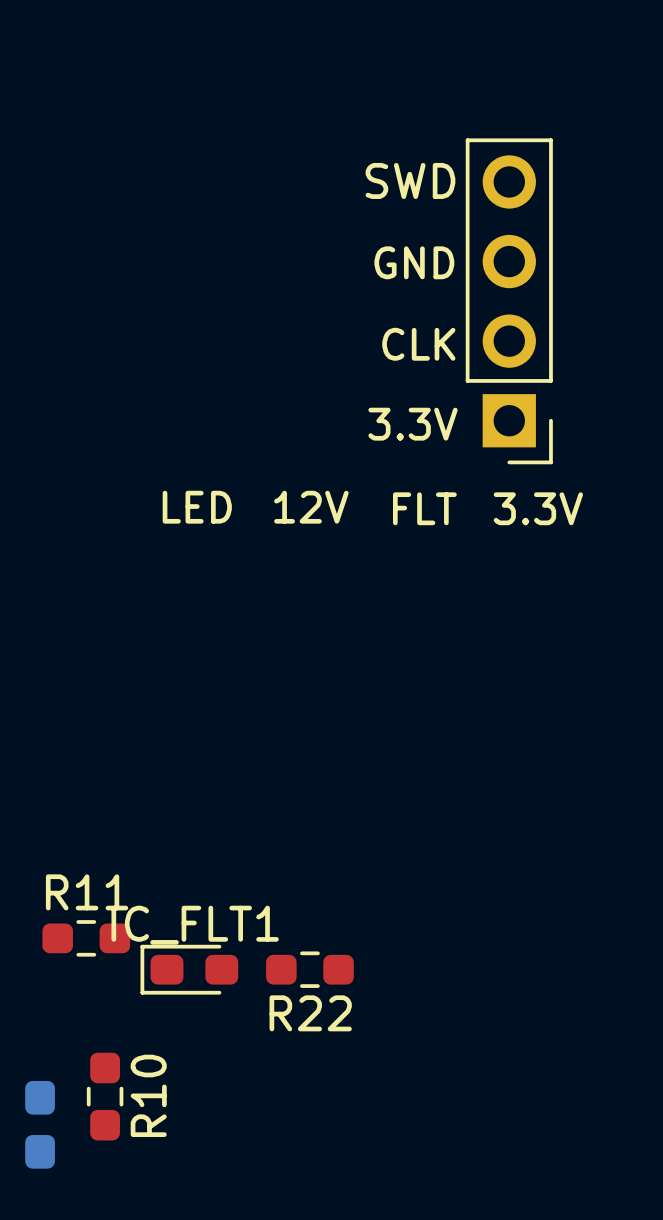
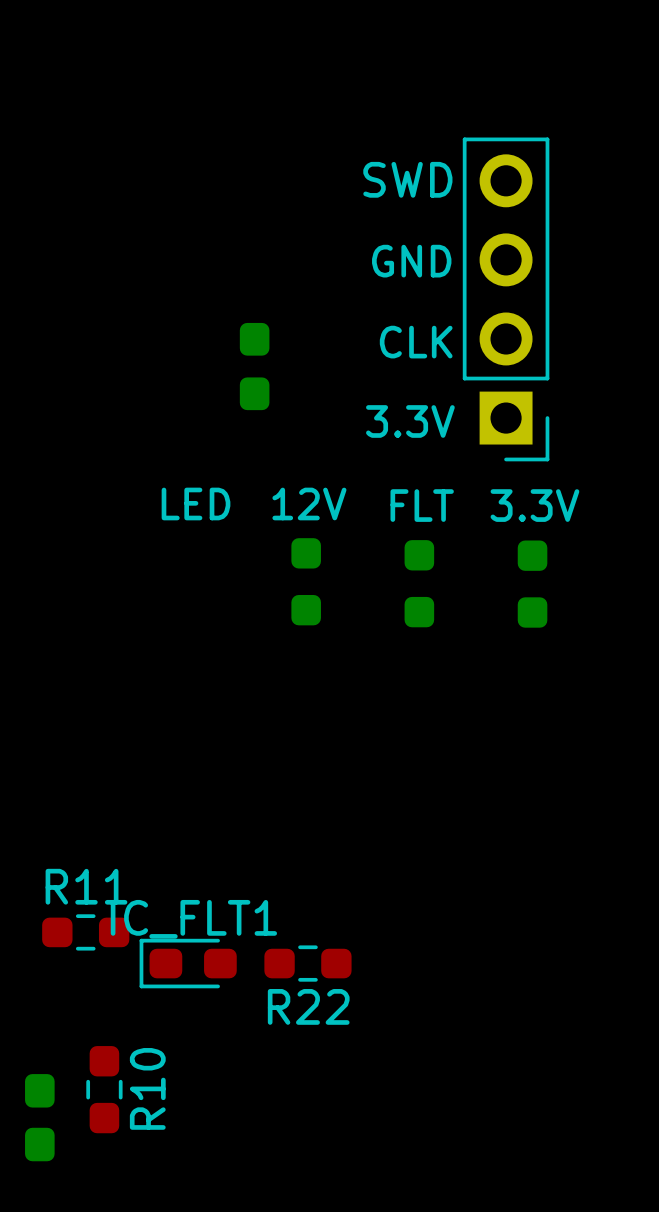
part: none -> (254, 366)
part: none -> (306, 581)
part: none -> (419, 583)
part: none -> (532, 584)

